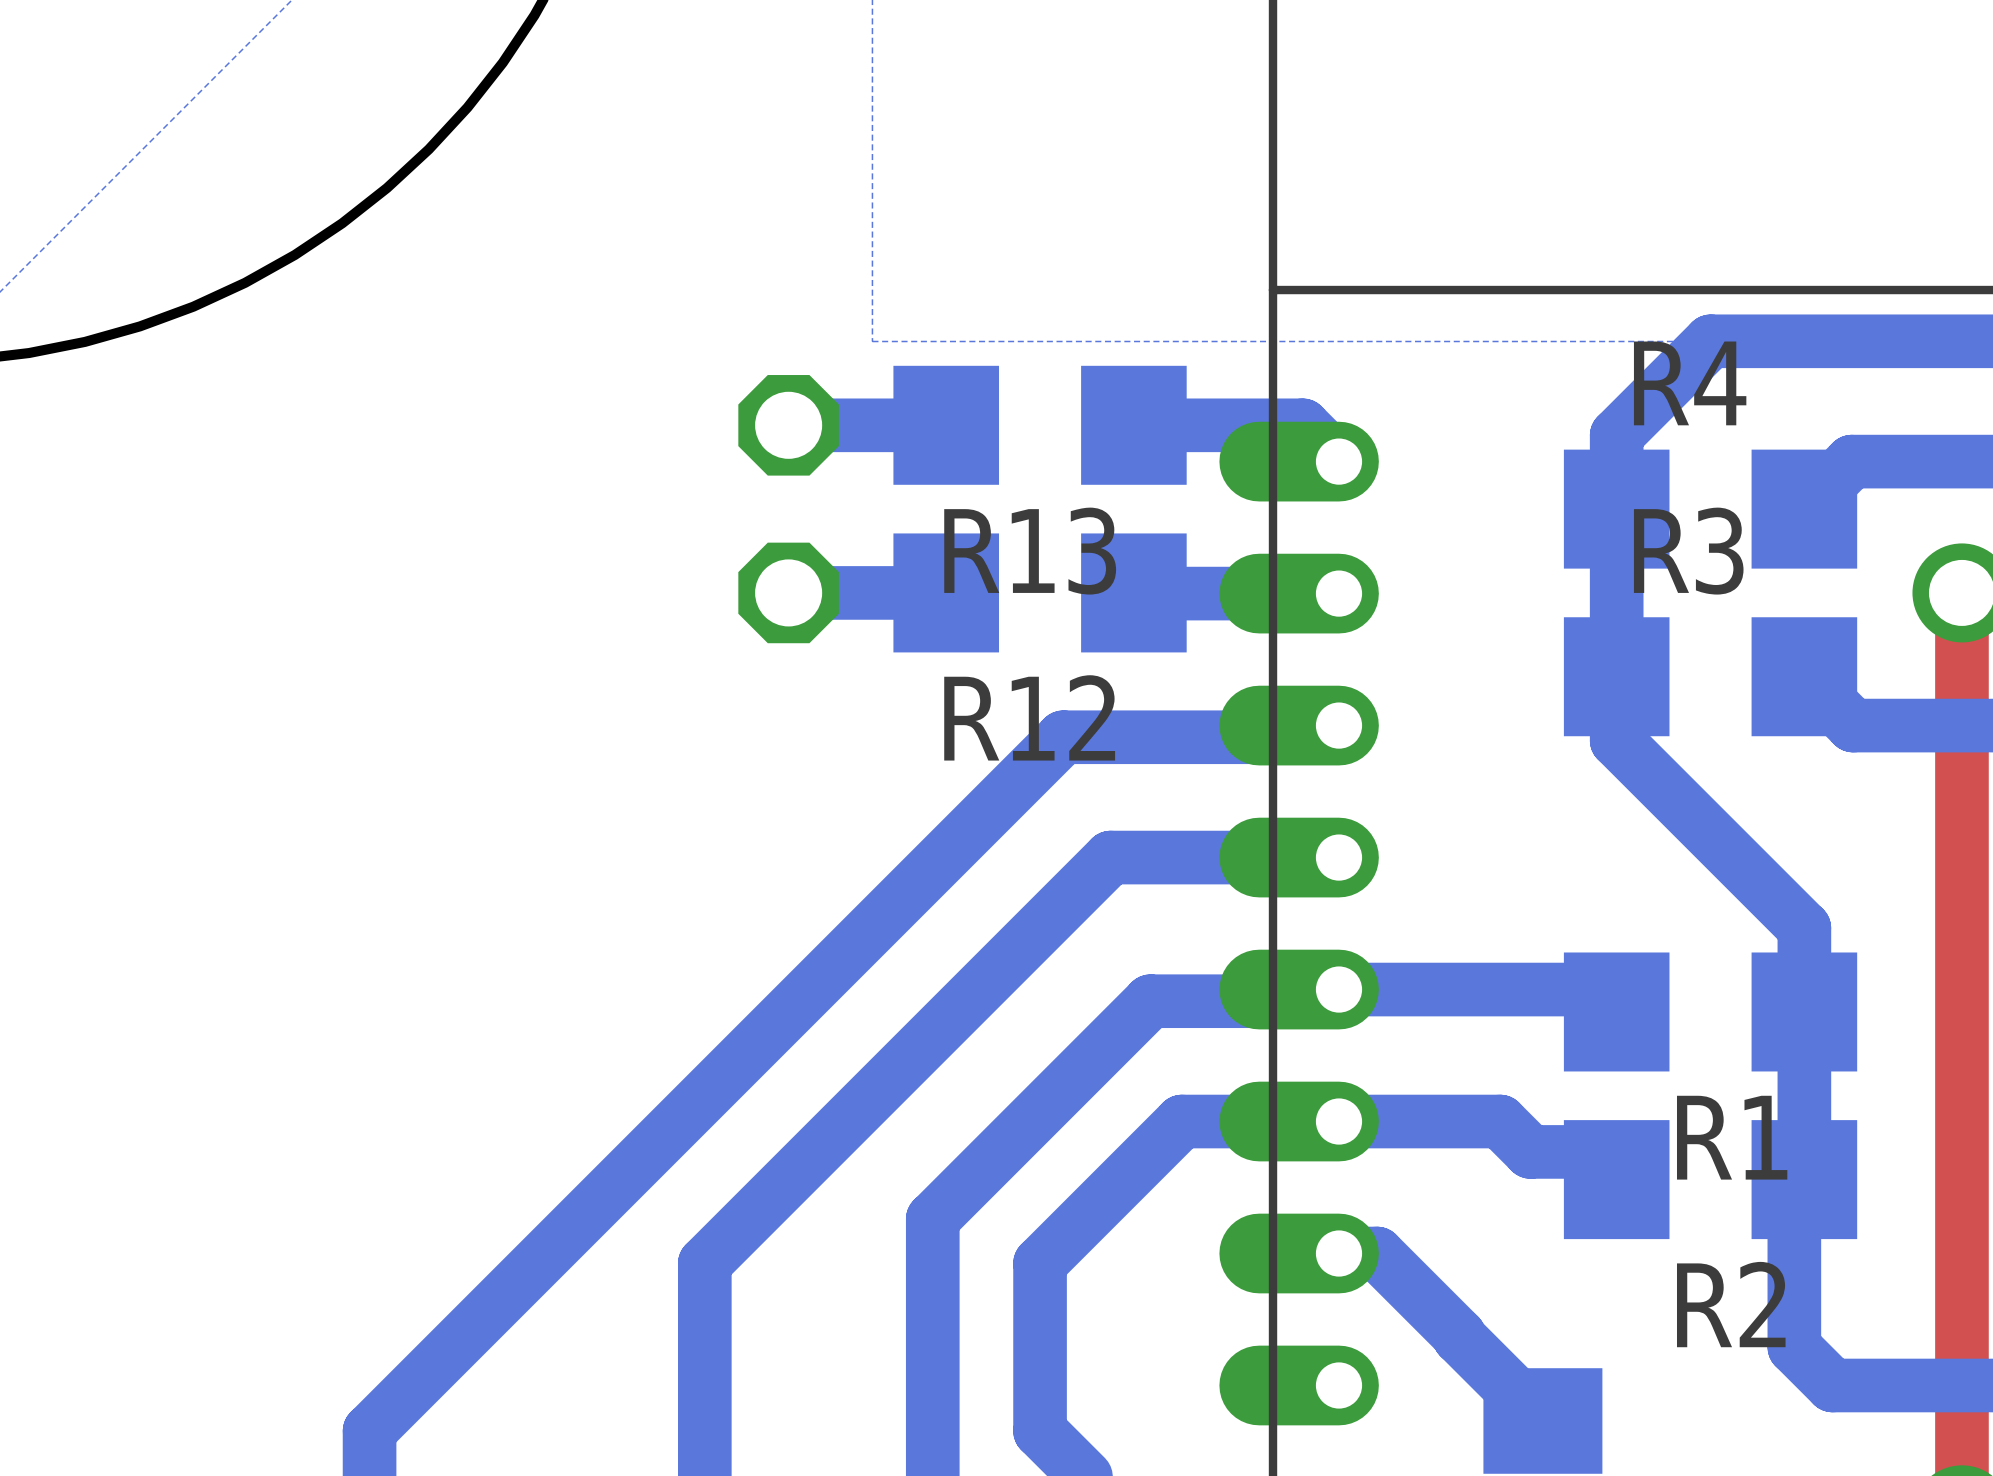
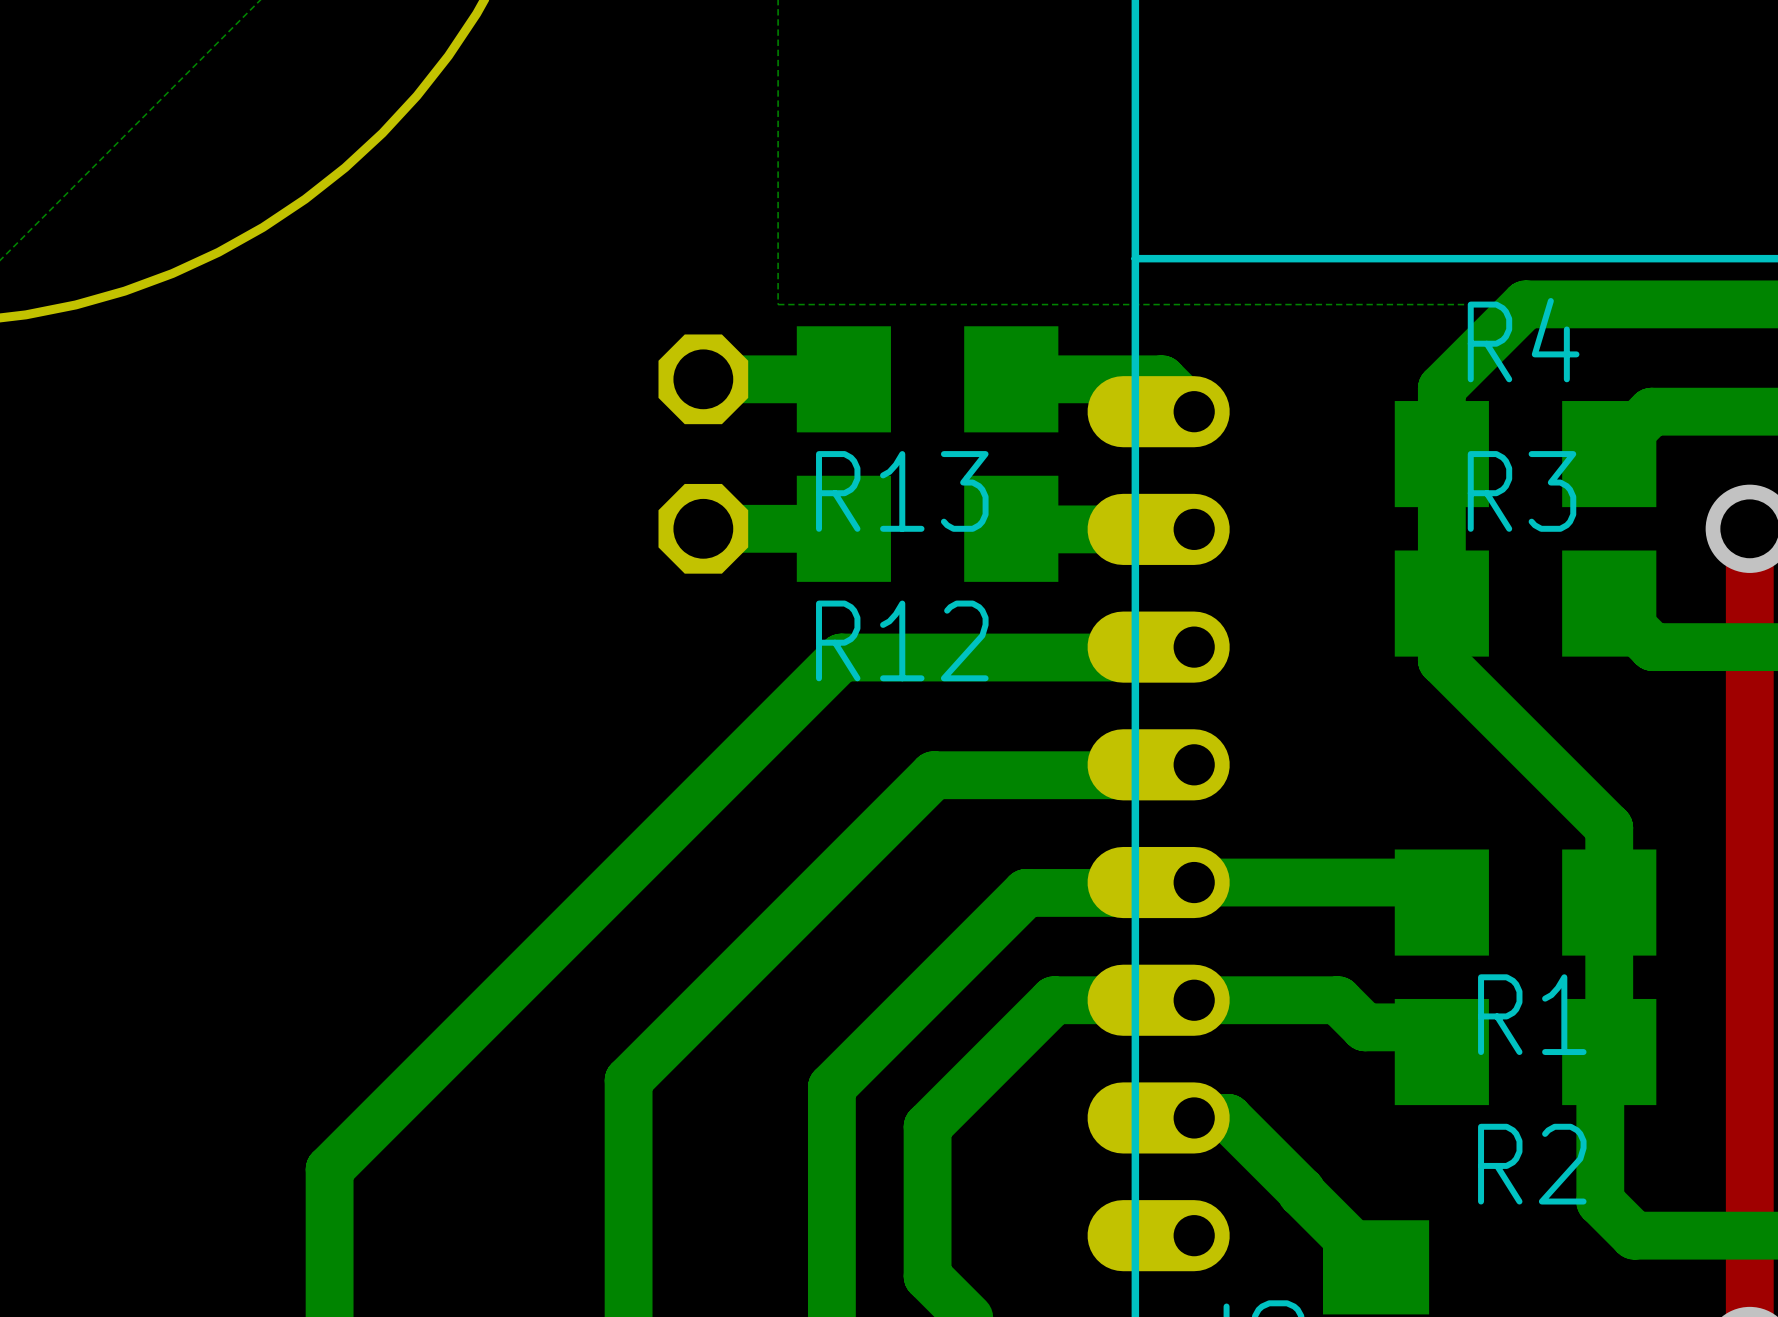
bottom track: (1063, 737) (369, 1431) -> (948, 657) (841, 657) (329, 1169) (329, 1276)
bottom track: (1338, 857) (1110, 857) (704, 1263) -> (1194, 764) (1183, 775) (933, 775) (628, 1080) (628, 1126)

